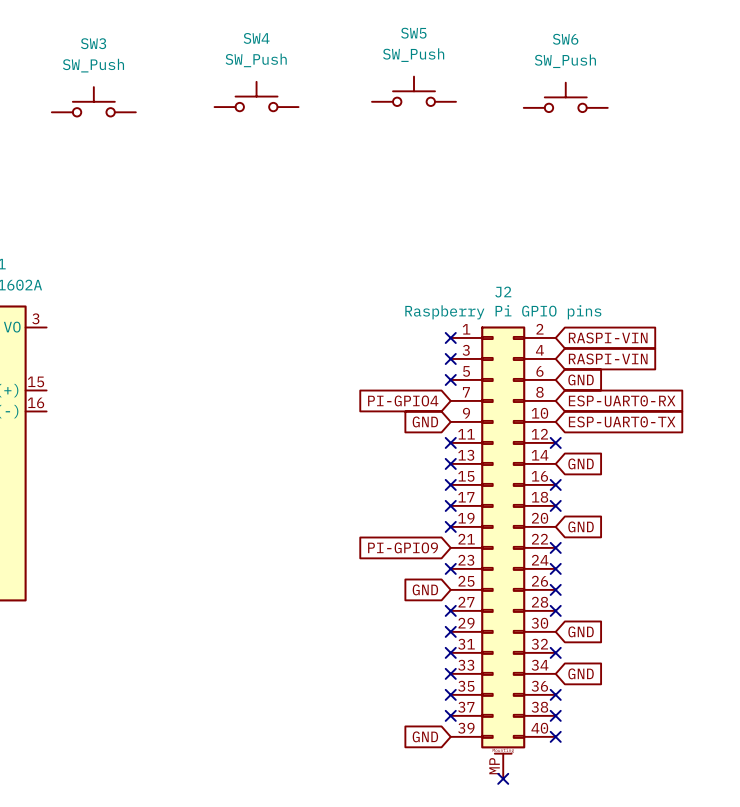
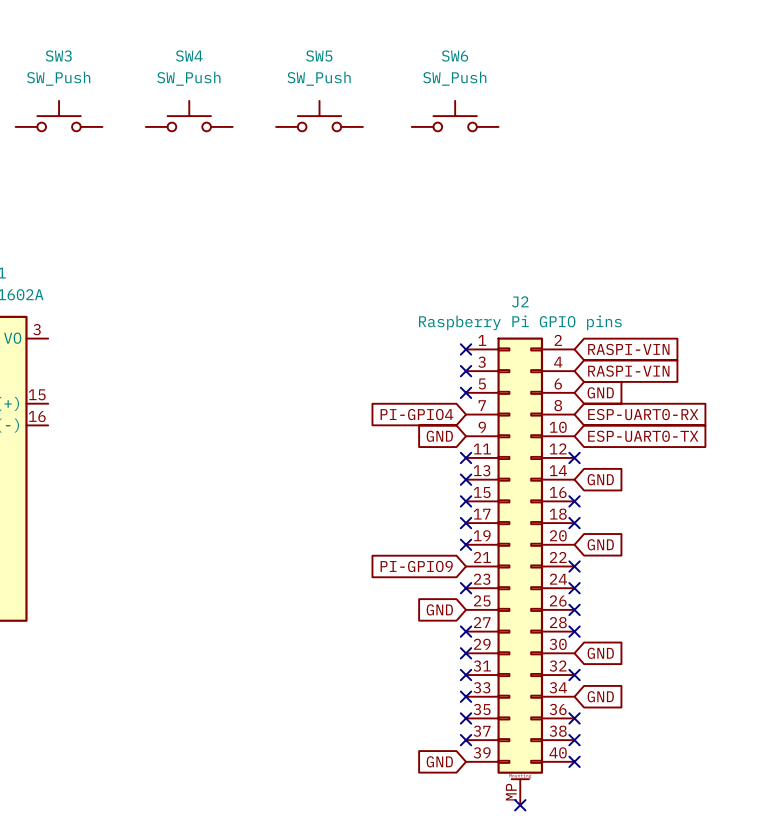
SW5 position: (414, 91) -> (319, 116)
SW4 position: (256, 96) -> (189, 116)
SW6 position: (565, 97) -> (455, 116)
SW3 position: (93, 101) -> (59, 116)

